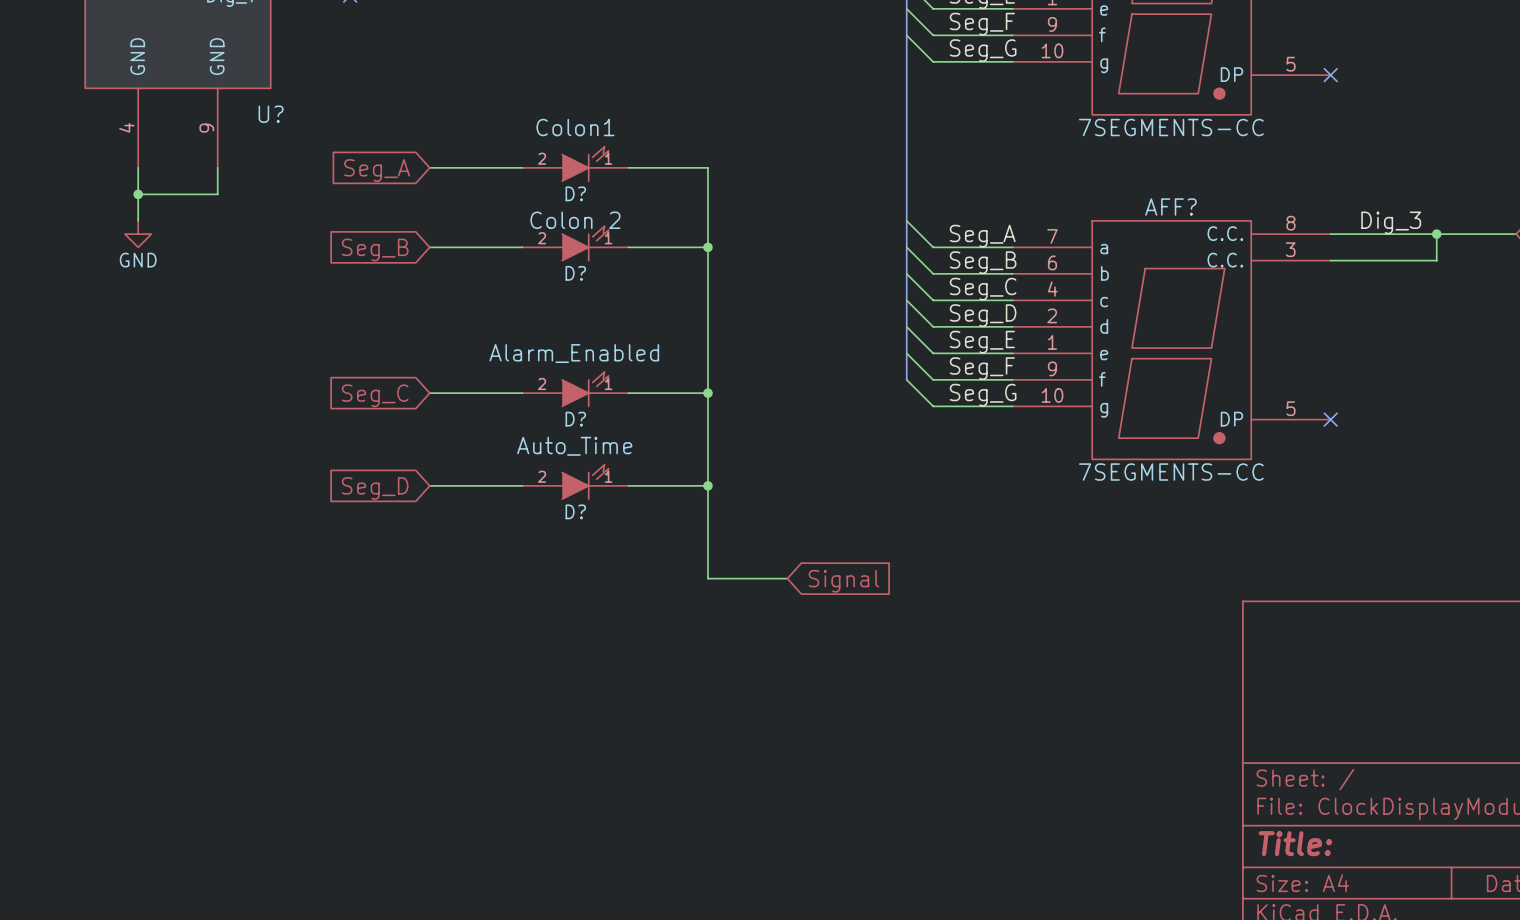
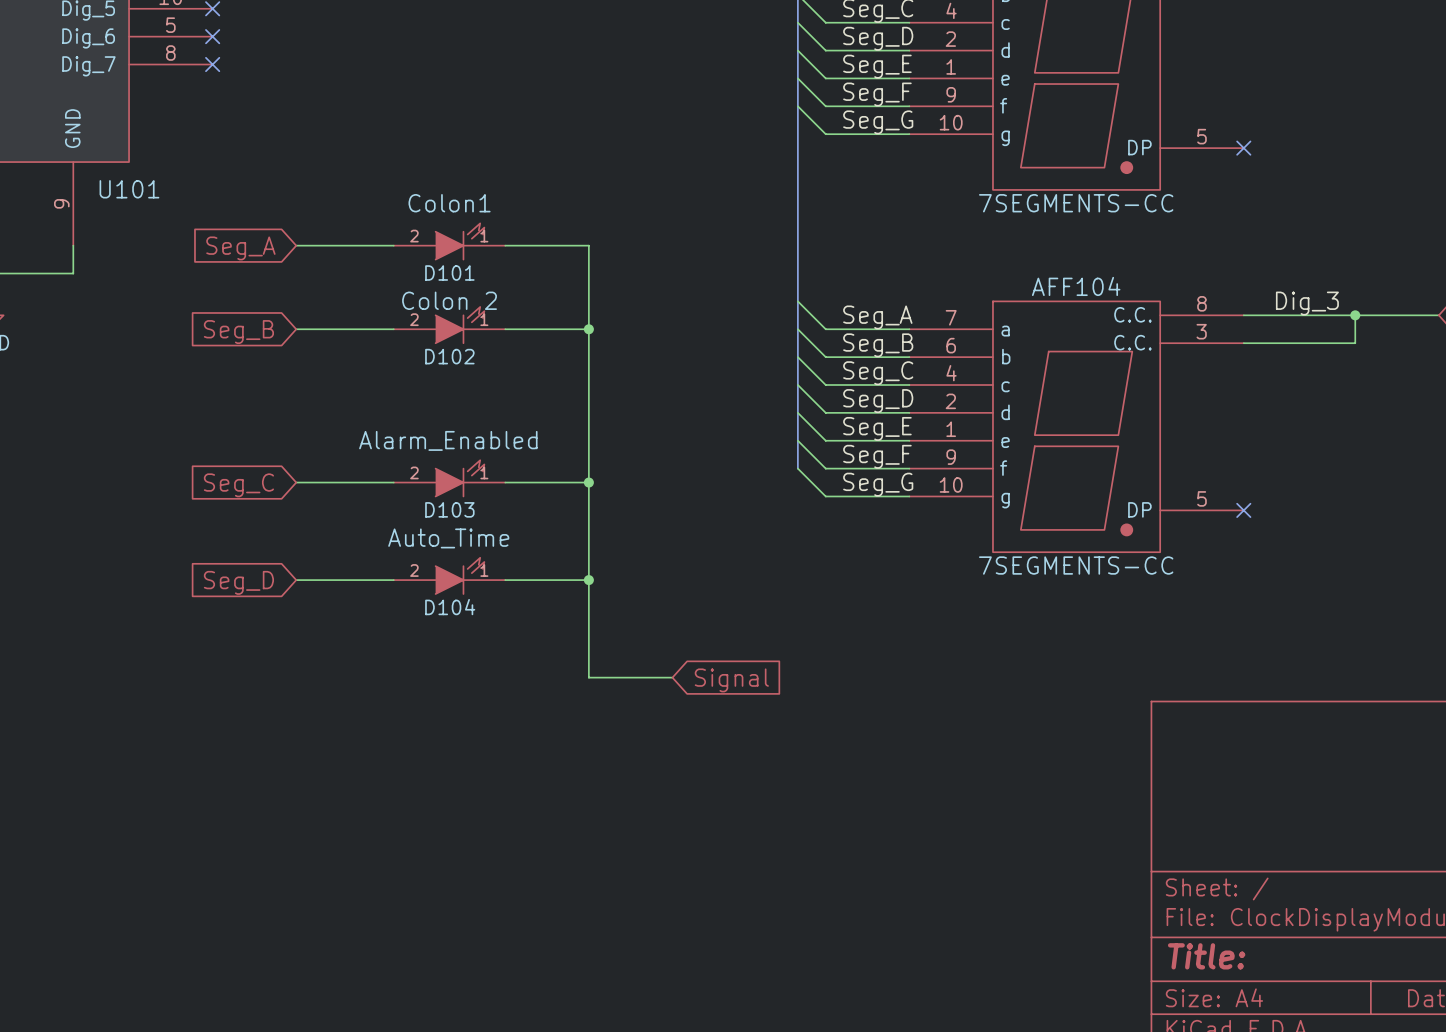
U? name: U? (271, 114) -> U101 (129, 189)
D? name: D? (575, 193) -> D101 (449, 273)
AFF? name: AFF? (1170, 207) -> AFF104 (1076, 286)
D? name: D? (575, 273) -> D102 (449, 356)
D? name: D? (575, 419) -> D103 (449, 509)
D? name: D? (575, 511) -> D104 (450, 607)

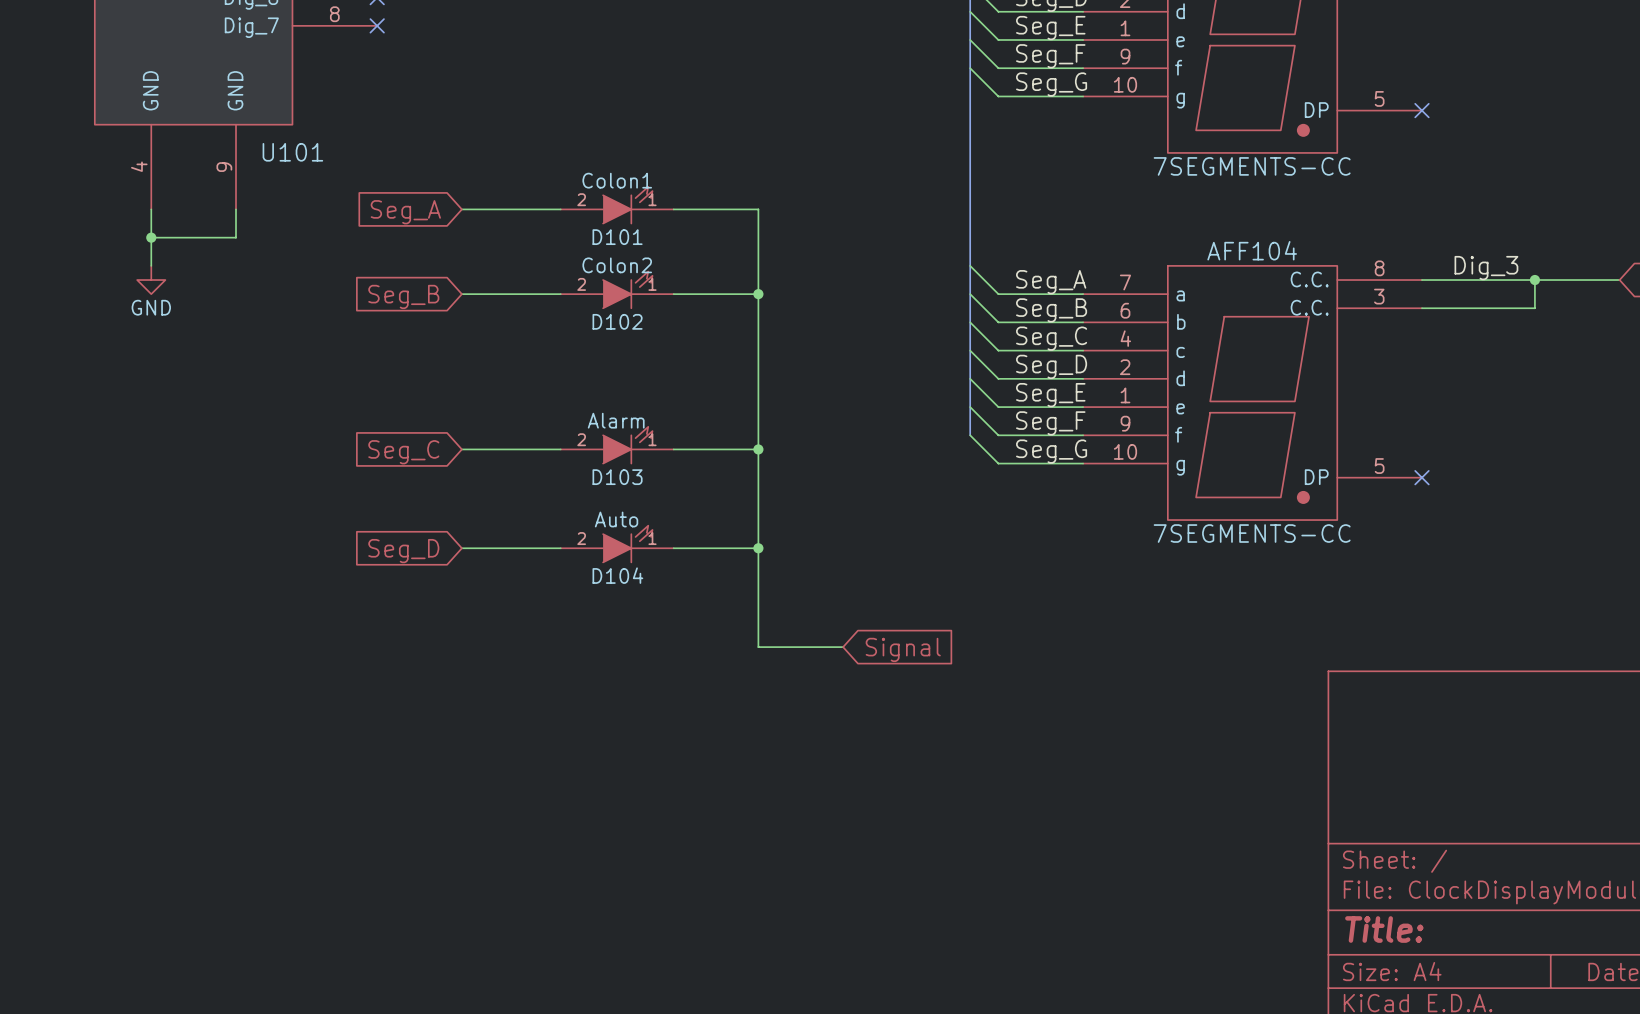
D101 text: Colon1 (449, 203) -> none
D101 value: none -> Colon1 (617, 180)
D102 text: Colon 2 (449, 300) -> none
D102 value: none -> Colon2 (617, 265)
D103 text: Alarm_Enabled (448, 440) -> none
D103 value: none -> Alarm (616, 420)
D104 text: Auto_Time (448, 538) -> none
D104 value: none -> Auto (616, 519)

